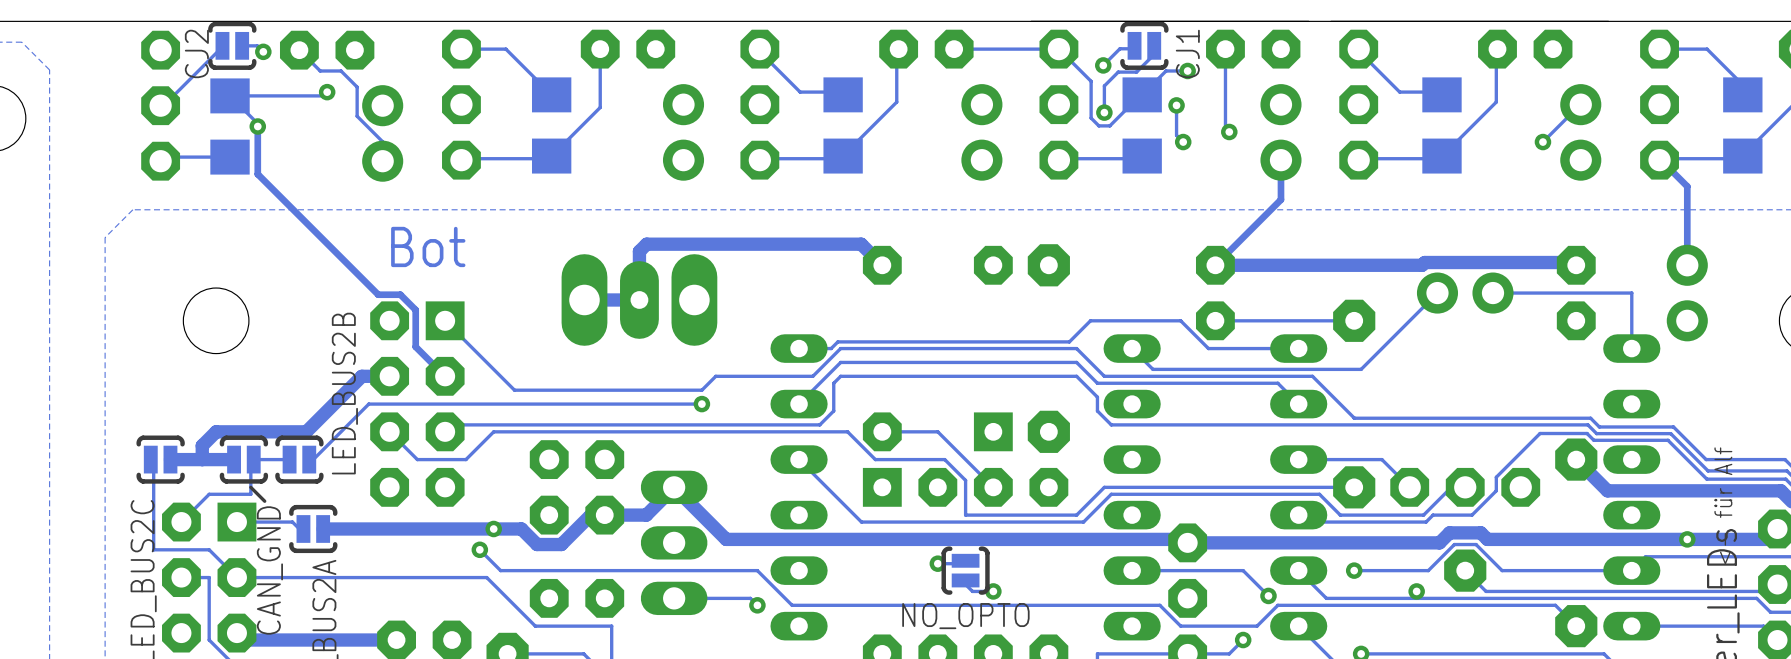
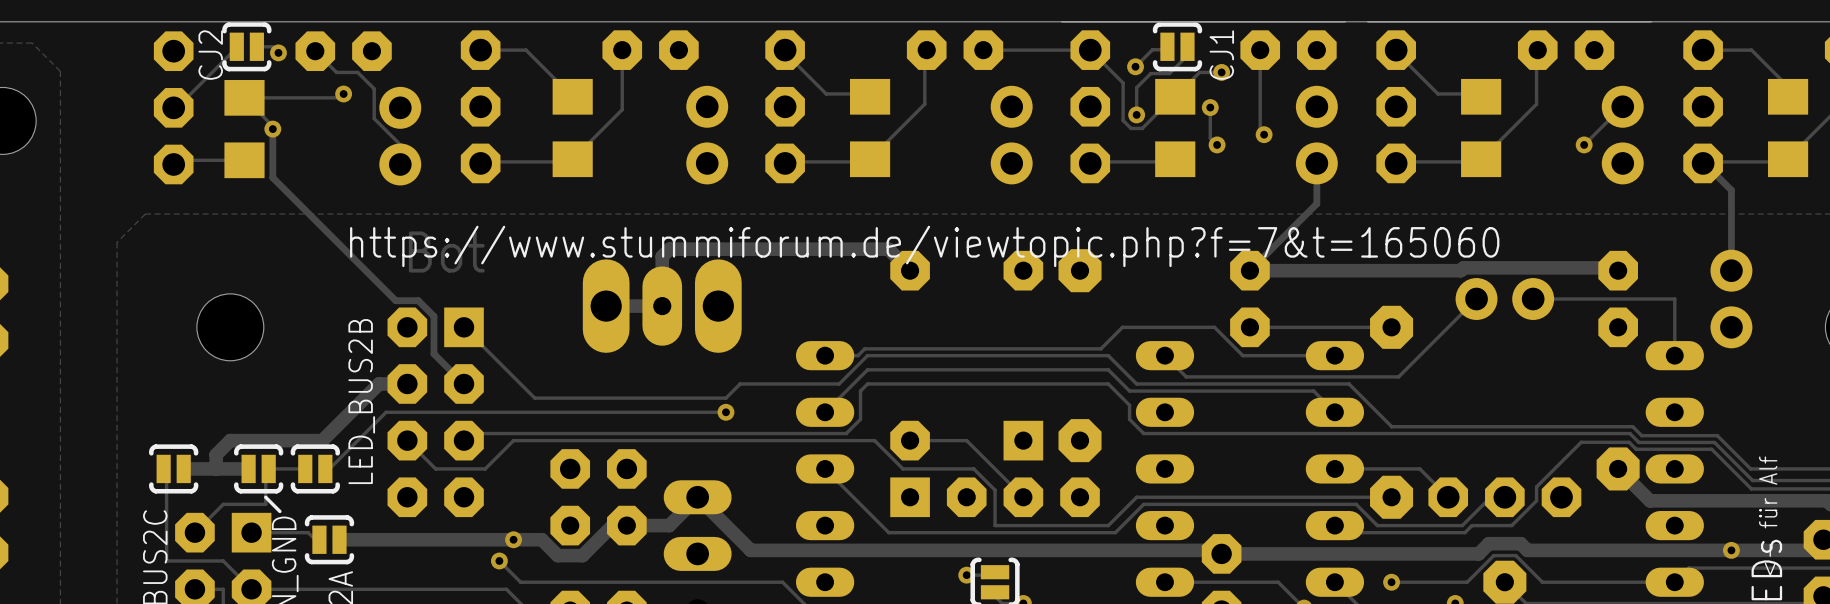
text: none -> https://www.stummiforum.de/viewtopic.php?f=7&t=165060 (924, 246)

